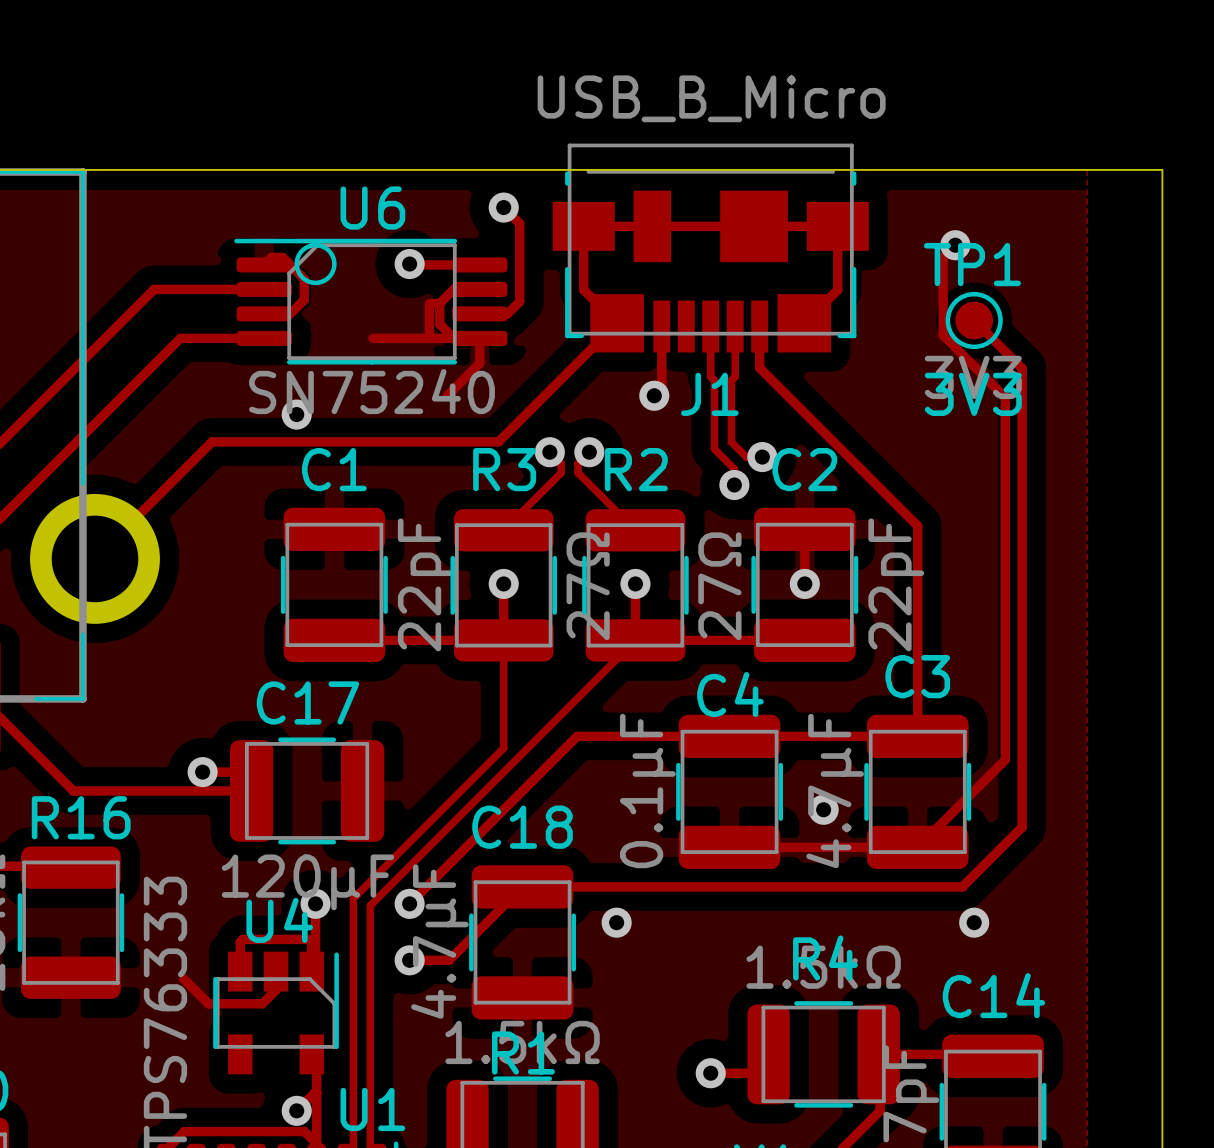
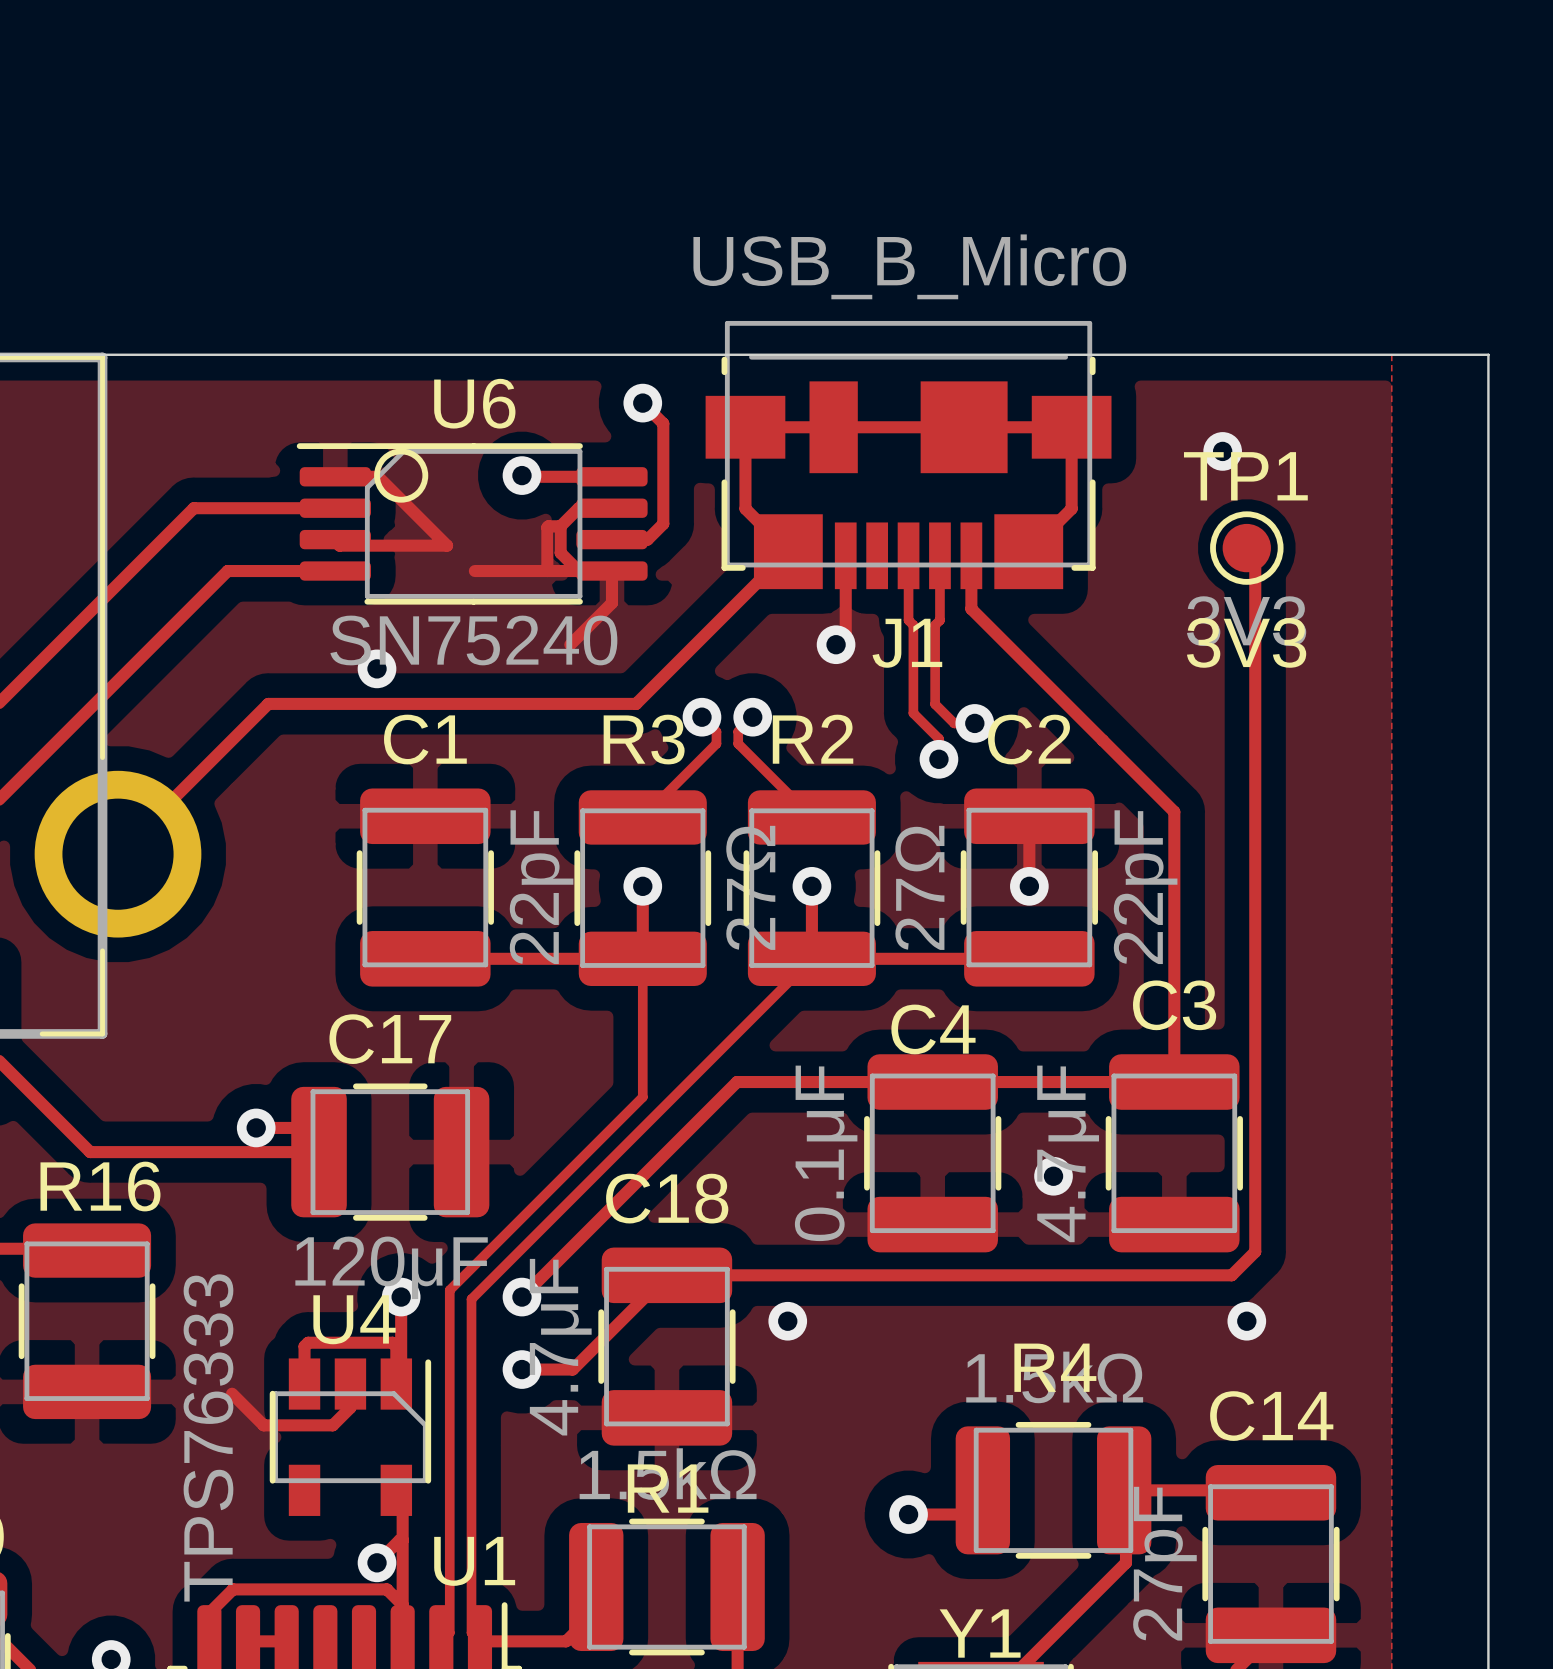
track: (955, 245) (943, 257) (943, 335) (1005, 397) (1005, 759) (917, 847) (729, 847) -> none
track: (264, 264) (271, 257) (282, 257) (304, 279) (304, 299) (290, 313) (264, 313) -> (335, 476) (378, 476) (447, 545) (339, 545) (335, 539)
track: (980, 327) (1022, 368) (1022, 827) (980, 868) -> (1255, 556) (1255, 1251)

